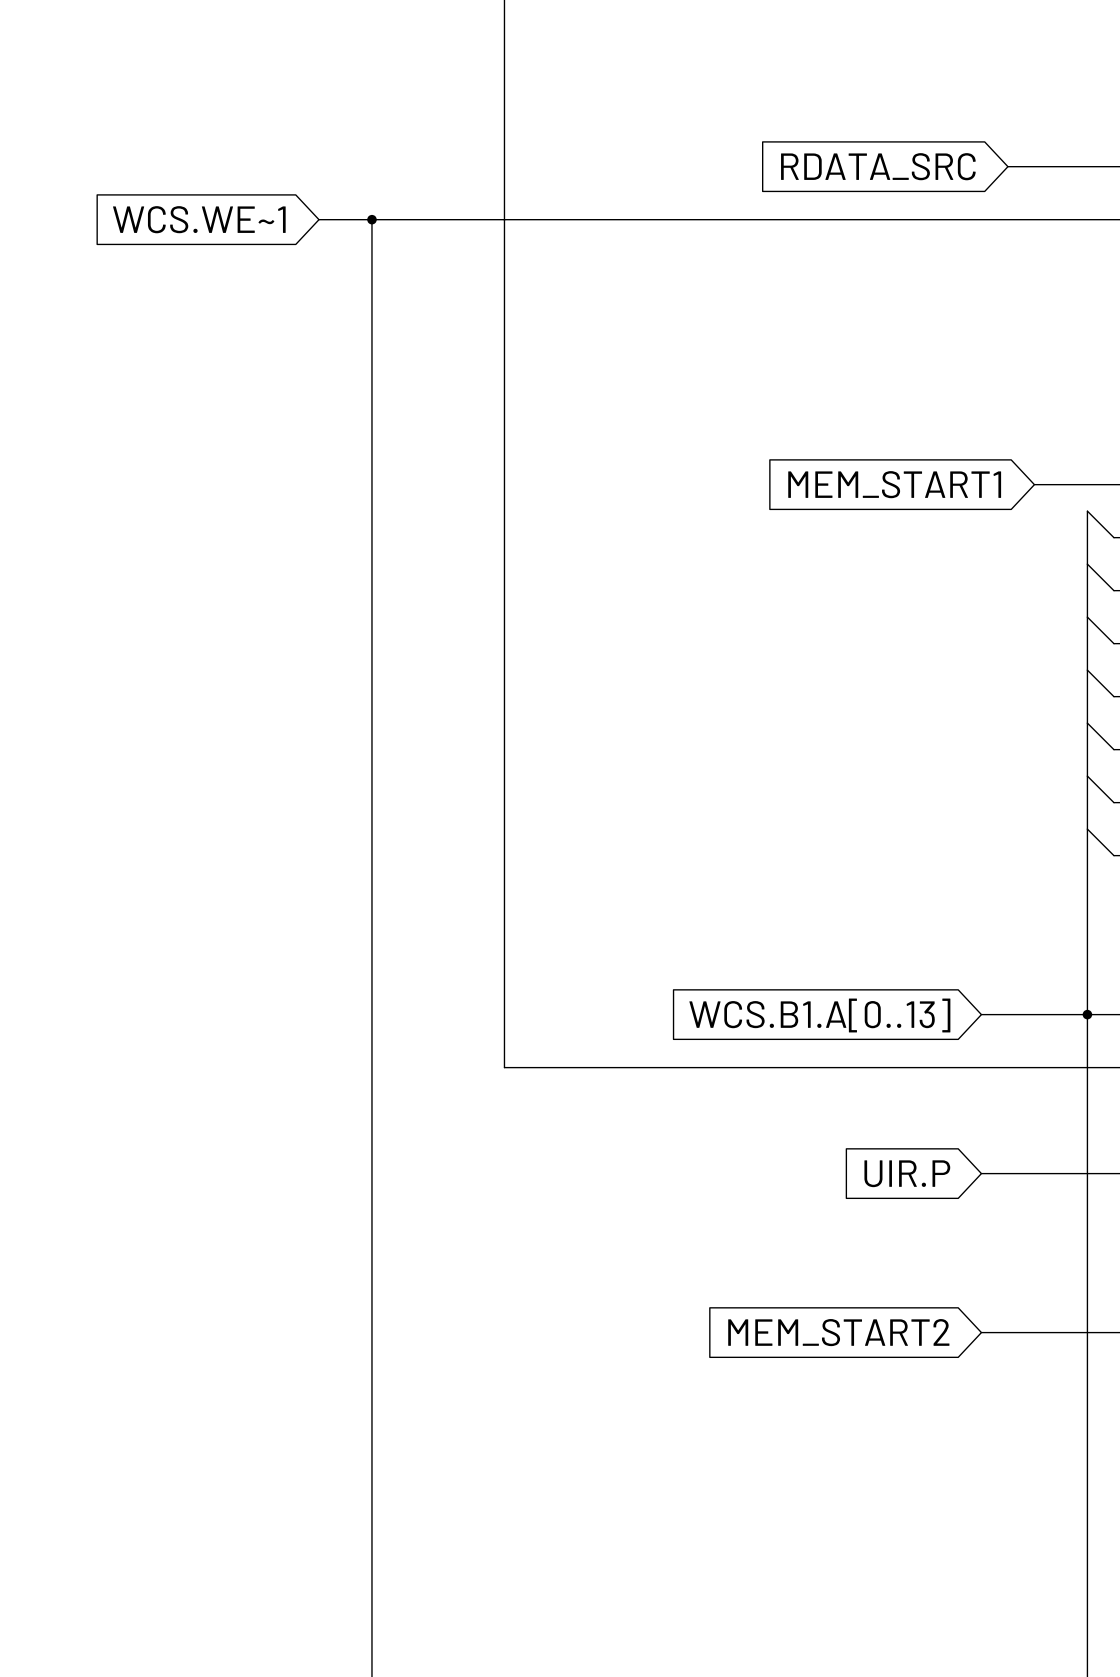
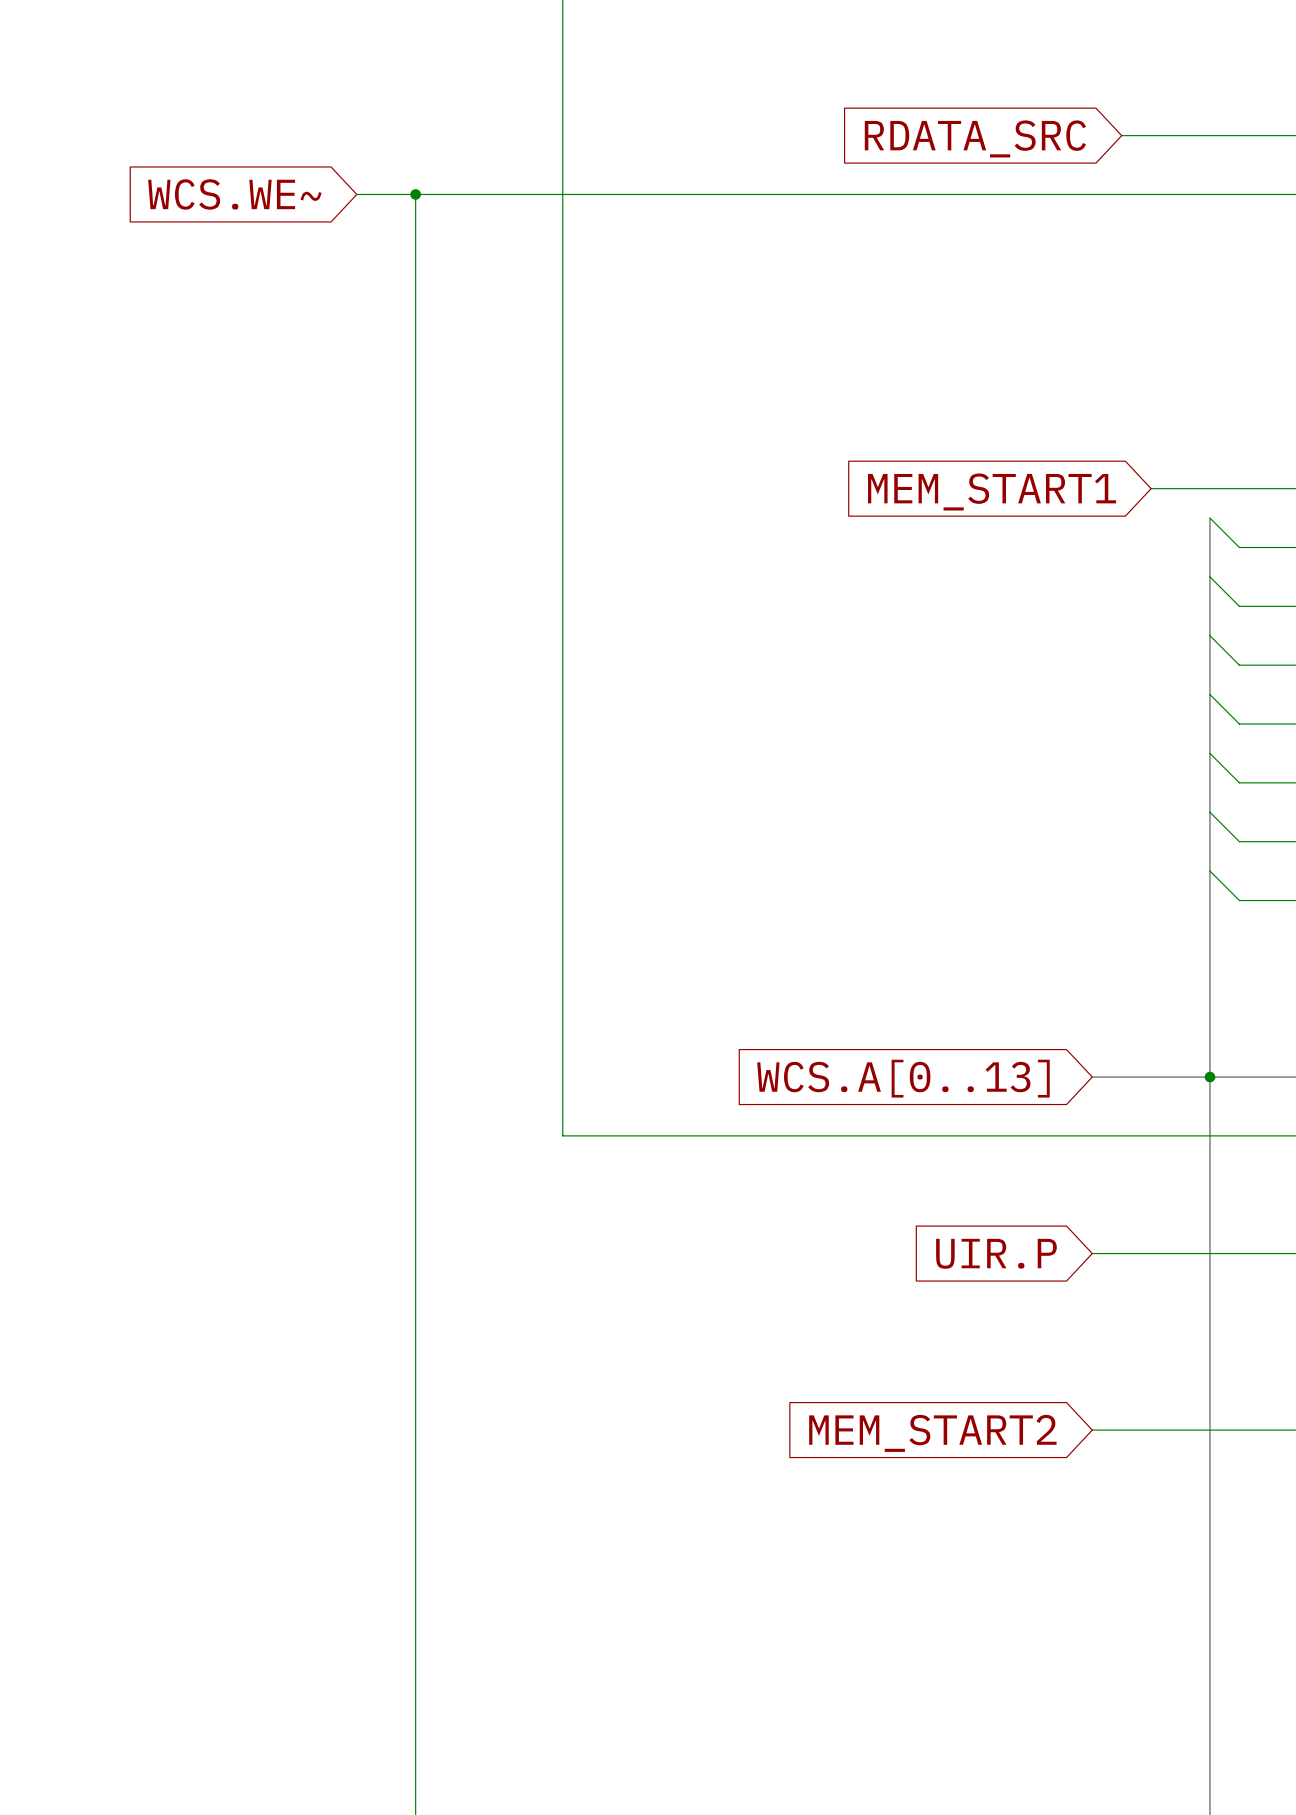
global label: WCS.WE~1 (199, 219) -> WCS.WE~ (234, 194)
global label: WCS.B1.A[0..13] (819, 1015) -> WCS.A[0..13] (903, 1078)

